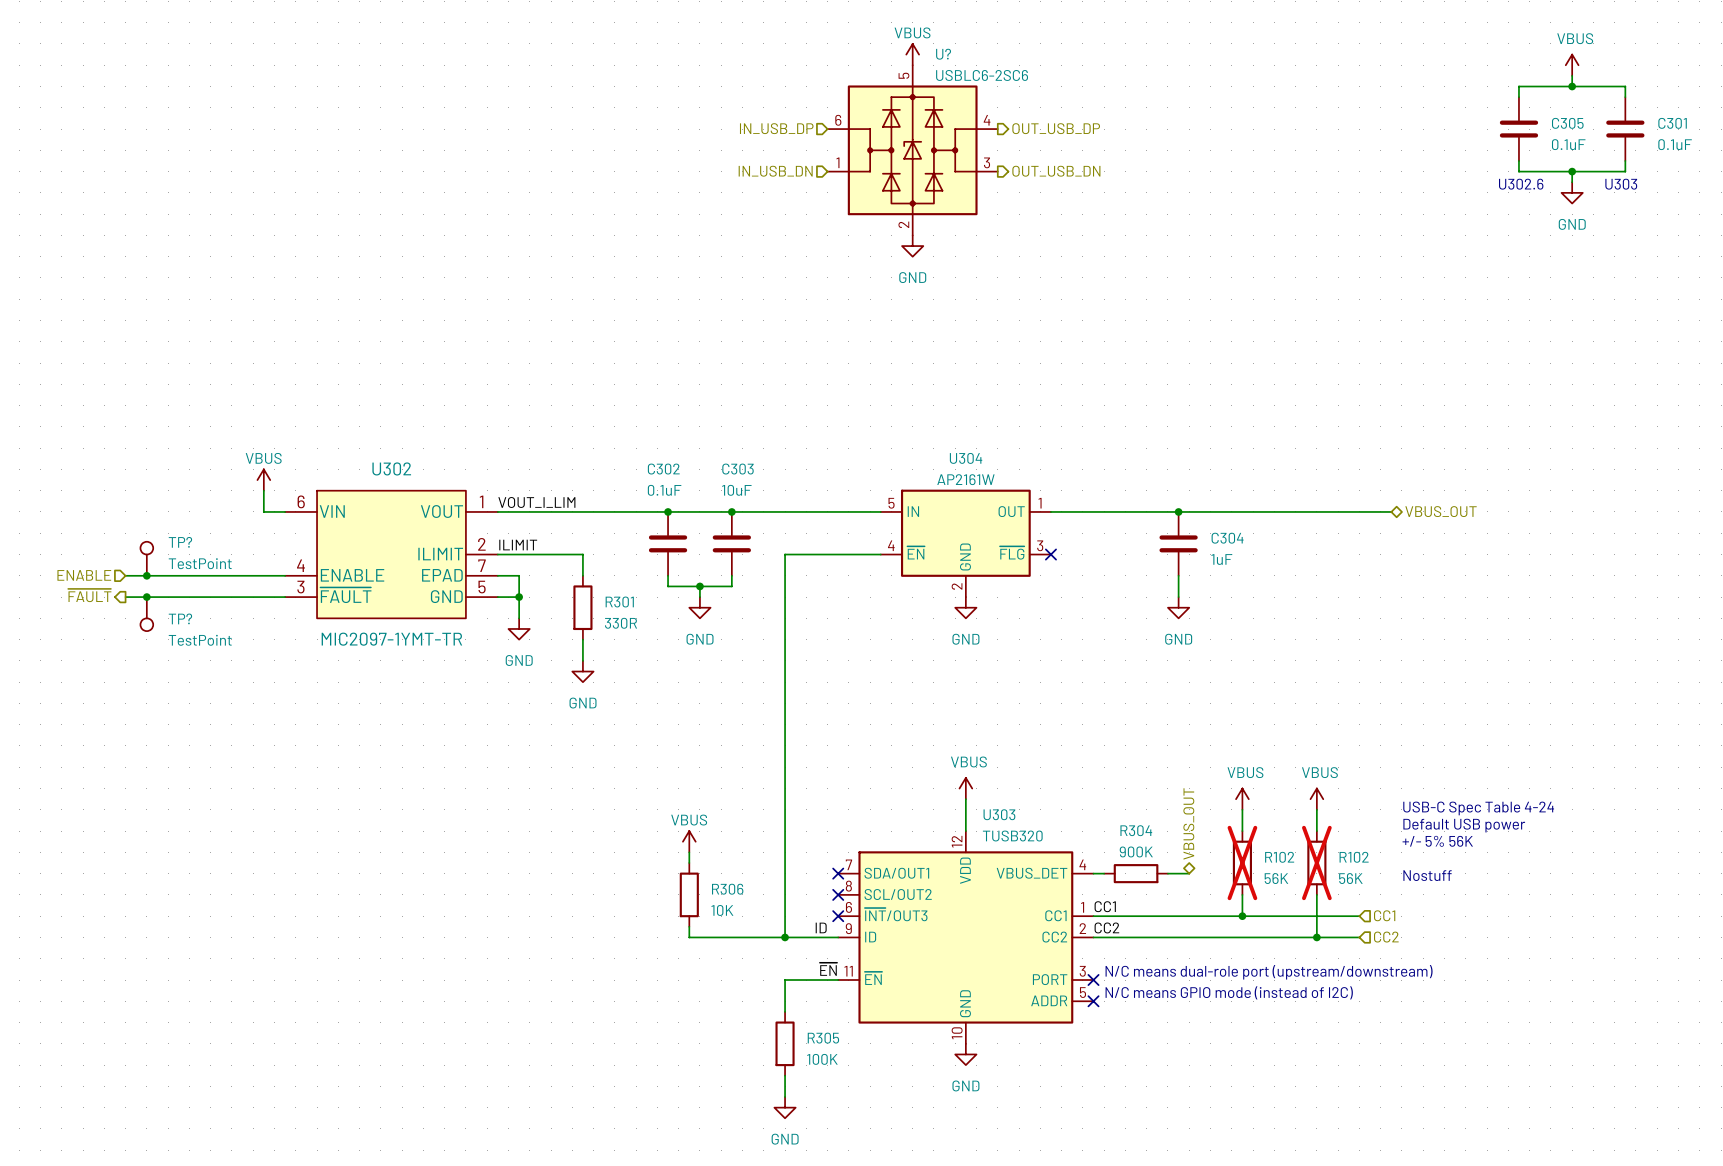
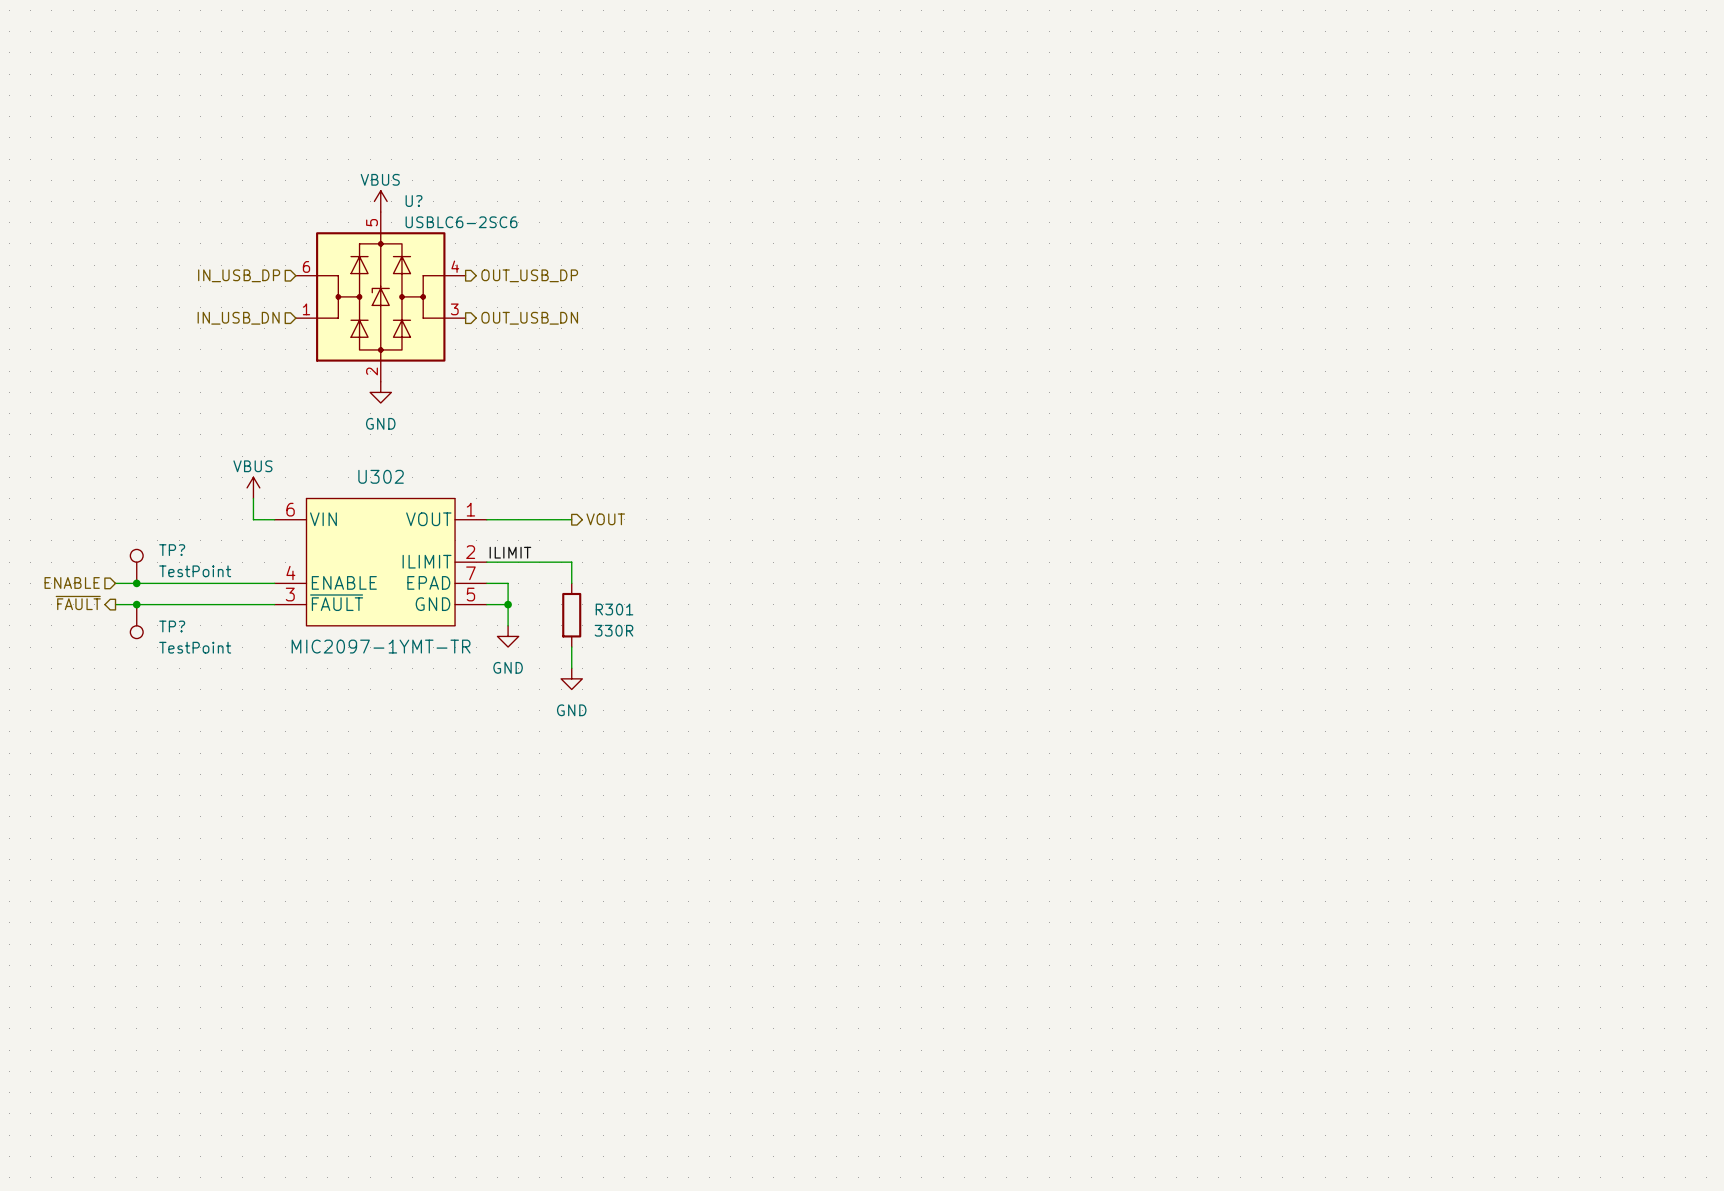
power symbol: VBUS (912, 54) -> none
power symbol: VBUS (1572, 65) -> none
wire: (1572, 75) (1572, 86) -> none
junction: (1572, 86) -> none
wire: (1518, 97) (1518, 86) (1625, 86) (1625, 97) -> none
hierarchical label: IN_USB_DP (776, 128) -> none
hierarchical label: OUT_USB_DP (1056, 128) -> none
C305: 0.1uF (1518, 129) -> none
C301: 0.1uF (1625, 129) -> none
U?: USBLC6-2SC6 (912, 150) -> none
wire: (1518, 160) (1518, 171) (1625, 171) (1625, 160) -> none
hierarchical label: IN_USB_DN (775, 171) -> none
hierarchical label: OUT_USB_DN (1056, 171) -> none
wire: (1572, 171) (1572, 182) -> none
junction: (1572, 171) -> none
text: U302.6 (1521, 184) -> none
text: U303 (1621, 184) -> none
power symbol: none -> VBUS (380, 201)
power symbol: GND (1572, 192) -> none
power symbol: GND (912, 246) -> none
hierarchical label: none -> IN_USB_DP (239, 275)
hierarchical label: none -> OUT_USB_DP (529, 275)
U?: none -> USBLC6-2SC6 (380, 296)
hierarchical label: none -> IN_USB_DN (238, 318)
hierarchical label: none -> OUT_USB_DN (529, 318)
power symbol: none -> GND (380, 392)
label: VOUT_I_LIM (536, 502) -> none
wire: (582, 511) (880, 511) -> none
hierarchical label: none -> VOUT (605, 519)
junction: (668, 511) -> none
junction: (731, 511) -> none
wire: (1050, 511) (1391, 511) -> none
junction: (1178, 511) -> none
hierarchical label: VBUS_OUT (1441, 511) -> none
C302: 0.1uF (668, 543) -> none
C303: 10uF (731, 543) -> none
U304: AP2161W (965, 543) -> none
C304: 1uF (1178, 543) -> none
wire: (880, 554) (785, 554) (785, 937) -> none
no-connect mark: (1050, 554) -> none
wire: (668, 575) (668, 586) (731, 586) (731, 575) -> none
wire: (1178, 575) (1178, 597) -> none
wire: (699, 586) (699, 597) -> none
junction: (699, 586) -> none
power symbol: GND (699, 607) -> none
power symbol: GND (965, 607) -> none
power symbol: GND (1178, 607) -> none
power symbol: VBUS (965, 788) -> none
wire: (965, 799) (965, 831) -> none
power symbol: VBUS (1242, 799) -> none
power symbol: VBUS (1316, 799) -> none
text: USB-C Spec Table 4-24 (1478, 808) -> none
wire: (1242, 809) (1242, 831) -> none
wire: (1316, 809) (1316, 831) -> none
hierarchical label: VBUS_OUT (1188, 823) -> none
text: Default USB power (1464, 825) -> none
power symbol: VBUS (689, 841) -> none
text: +/- 5% 56K (1437, 841) -> none
wire: (689, 852) (689, 862) -> none
R102: 56K (1242, 862) -> none
R102: 56K (1316, 862) -> none
no-connect mark: (838, 873) -> none
wire: (1093, 873) (1104, 873) -> none
R304: 900K (1136, 873) -> none
wire: (1167, 873) (1189, 873) -> none
text: Nostuff (1427, 875) -> none
R306: 10K (689, 894) -> none
no-connect mark: (838, 894) -> none
wire: (1242, 894) (1242, 916) -> none
wire: (1316, 894) (1316, 937) -> none
label: CC1 (1105, 906) -> none
hierarchical label: CC1 (1384, 915) -> none
no-connect mark: (838, 916) -> none
wire: (1093, 916) (1359, 916) -> none
junction: (1242, 916) -> none
wire: (689, 926) (689, 937) (838, 937) -> none
label: ID (821, 927) -> none
label: CC2 (1106, 927) -> none
junction: (785, 937) -> none
U303: TUSB320 (965, 937) -> none
wire: (1093, 937) (1359, 937) -> none
junction: (1316, 937) -> none
hierarchical label: CC2 (1386, 937) -> none
label: ~{EN} (828, 969) -> none
text: N/C means dual-role port (upstream/downstream) (1269, 972) -> none
wire: (838, 980) (785, 980) (785, 1011) -> none
no-connect mark: (1093, 980) -> none
text: N/C means GPIO mode (instead of I2C) (1229, 992) -> none
no-connect mark: (1093, 1001) -> none
R305: 100K (785, 1043) -> none
power symbol: GND (965, 1054) -> none
wire: (785, 1075) (785, 1097) -> none
power symbol: GND (785, 1107) -> none

